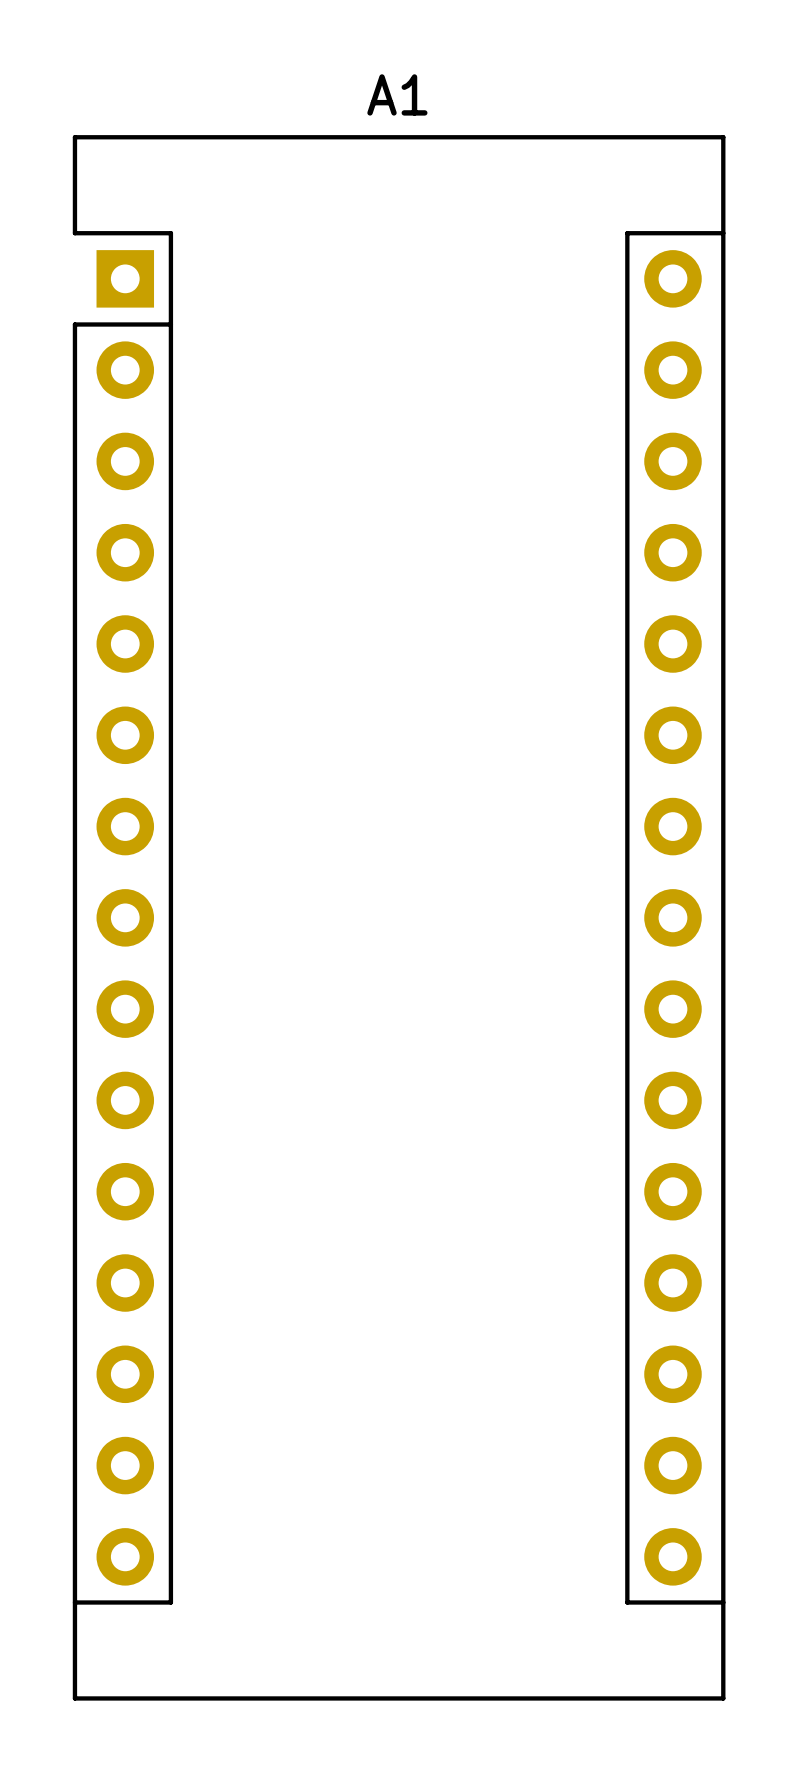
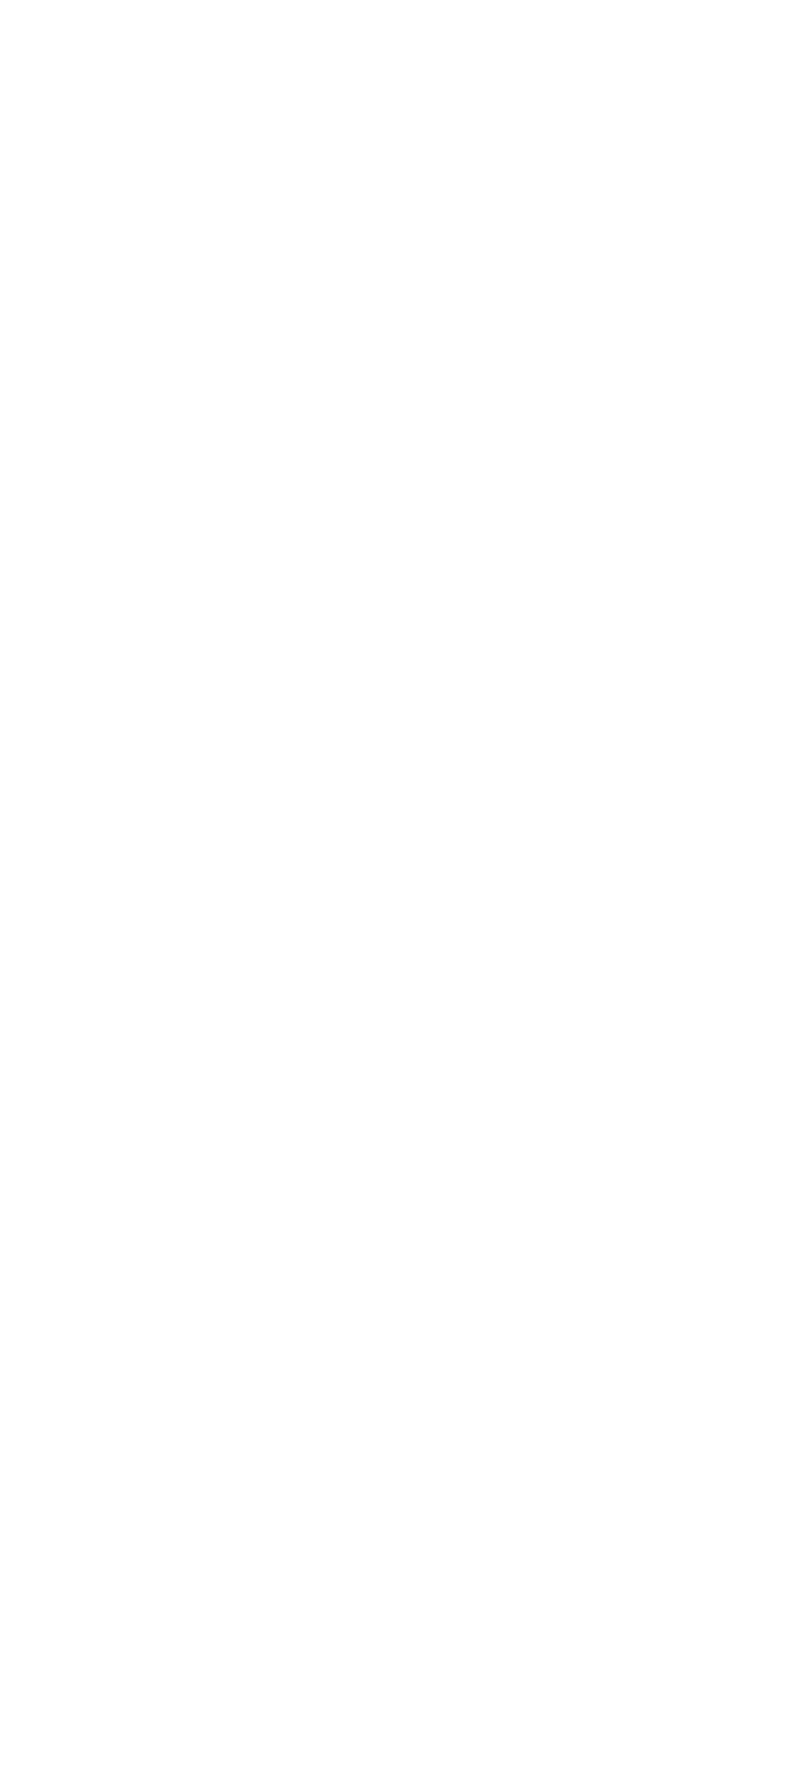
A1: (399, 917) -> none

